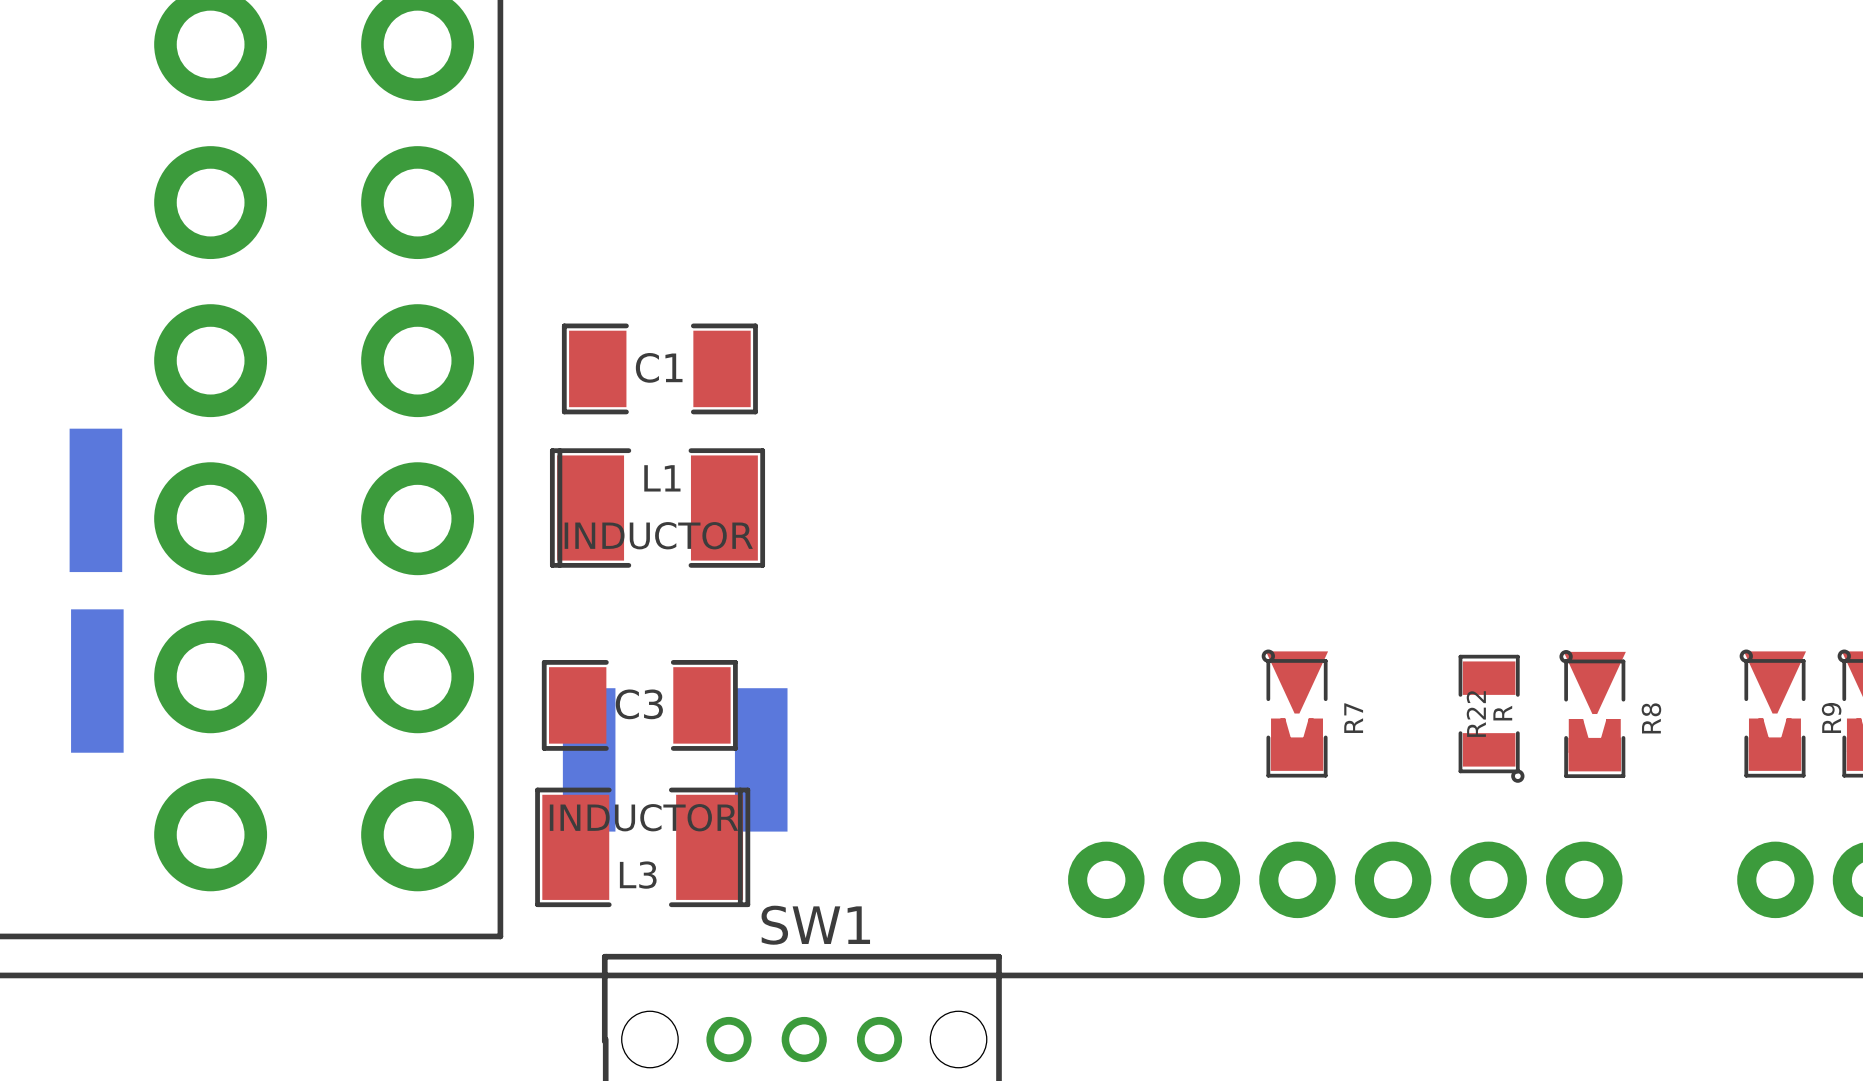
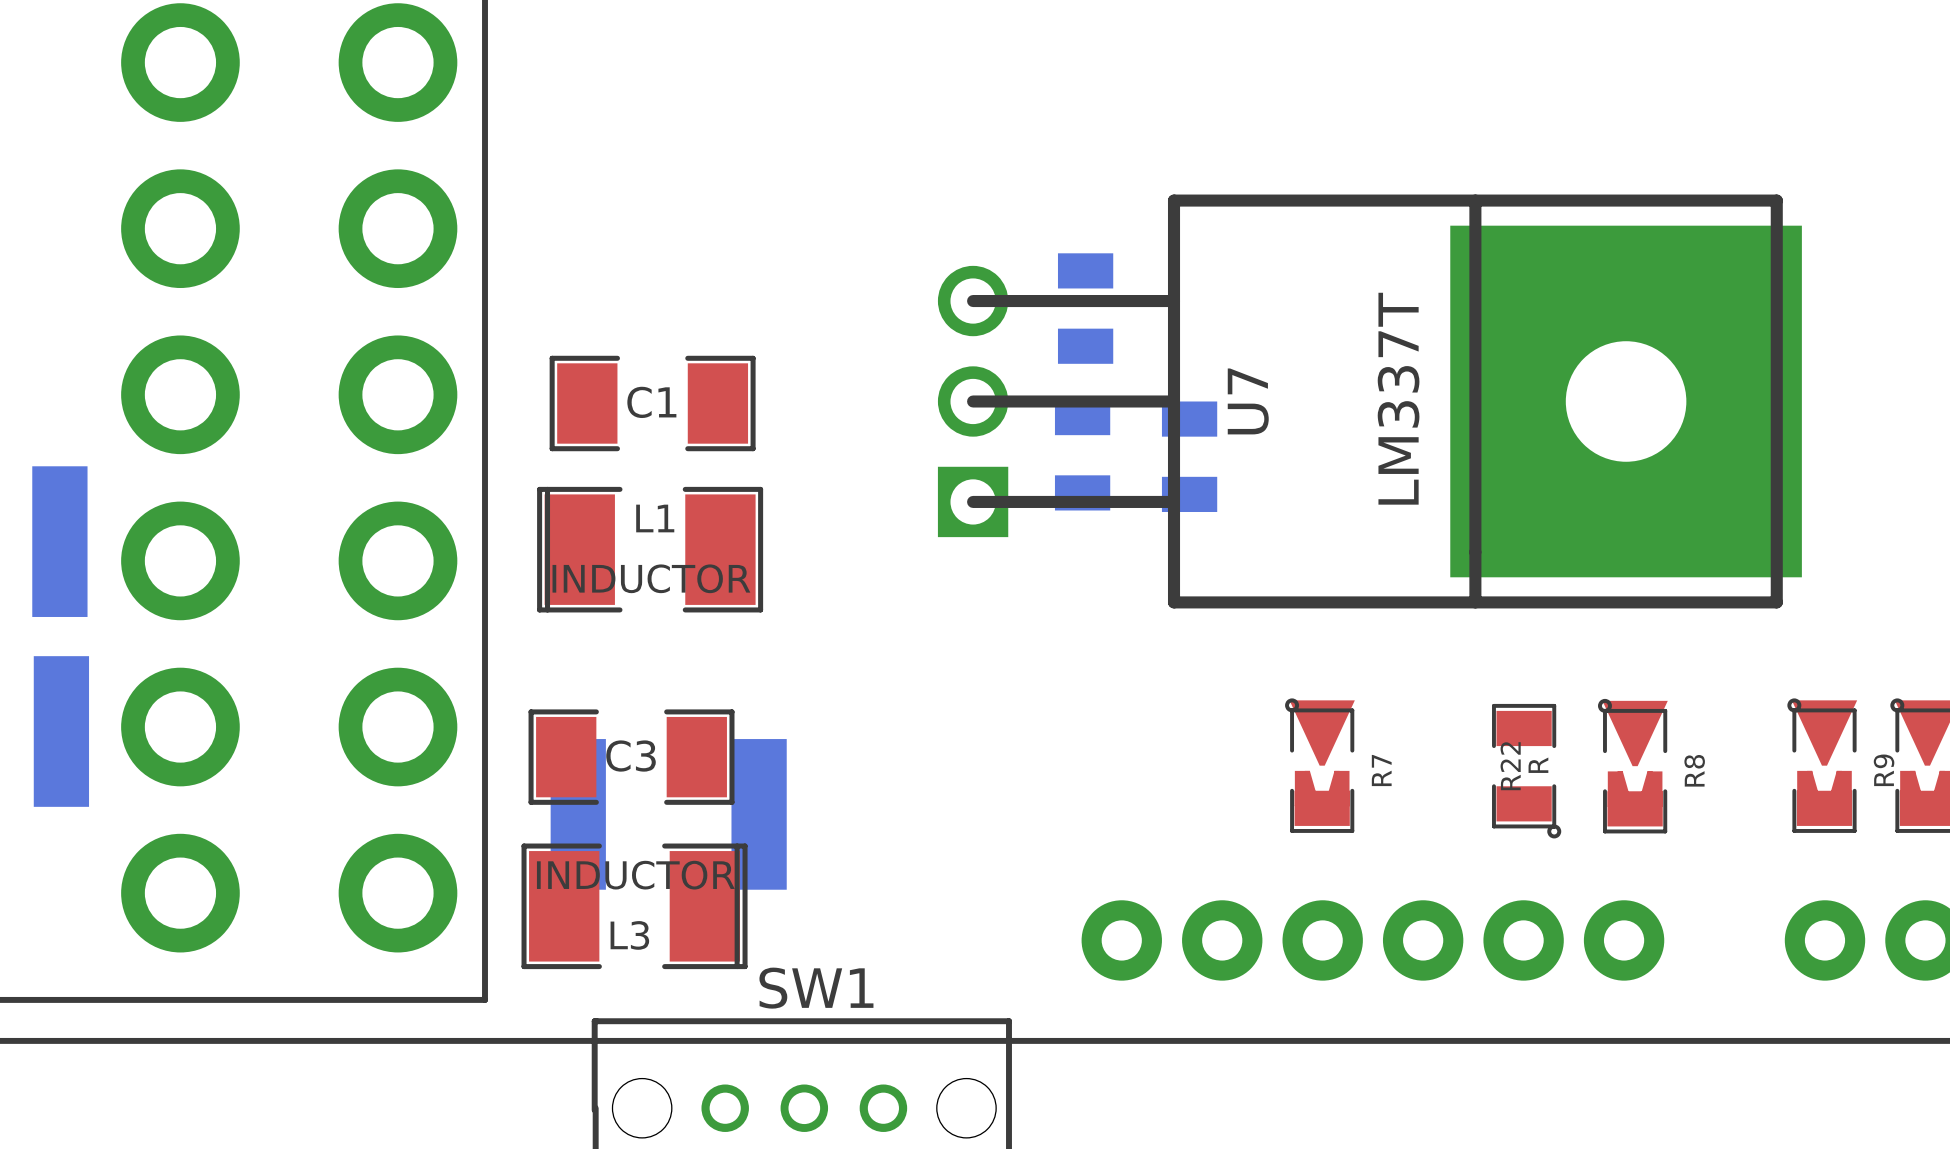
part: none -> (1085, 308)
U7: none -> LM337T (1369, 401)
part: none -> (1082, 455)
part: none -> (1189, 456)

